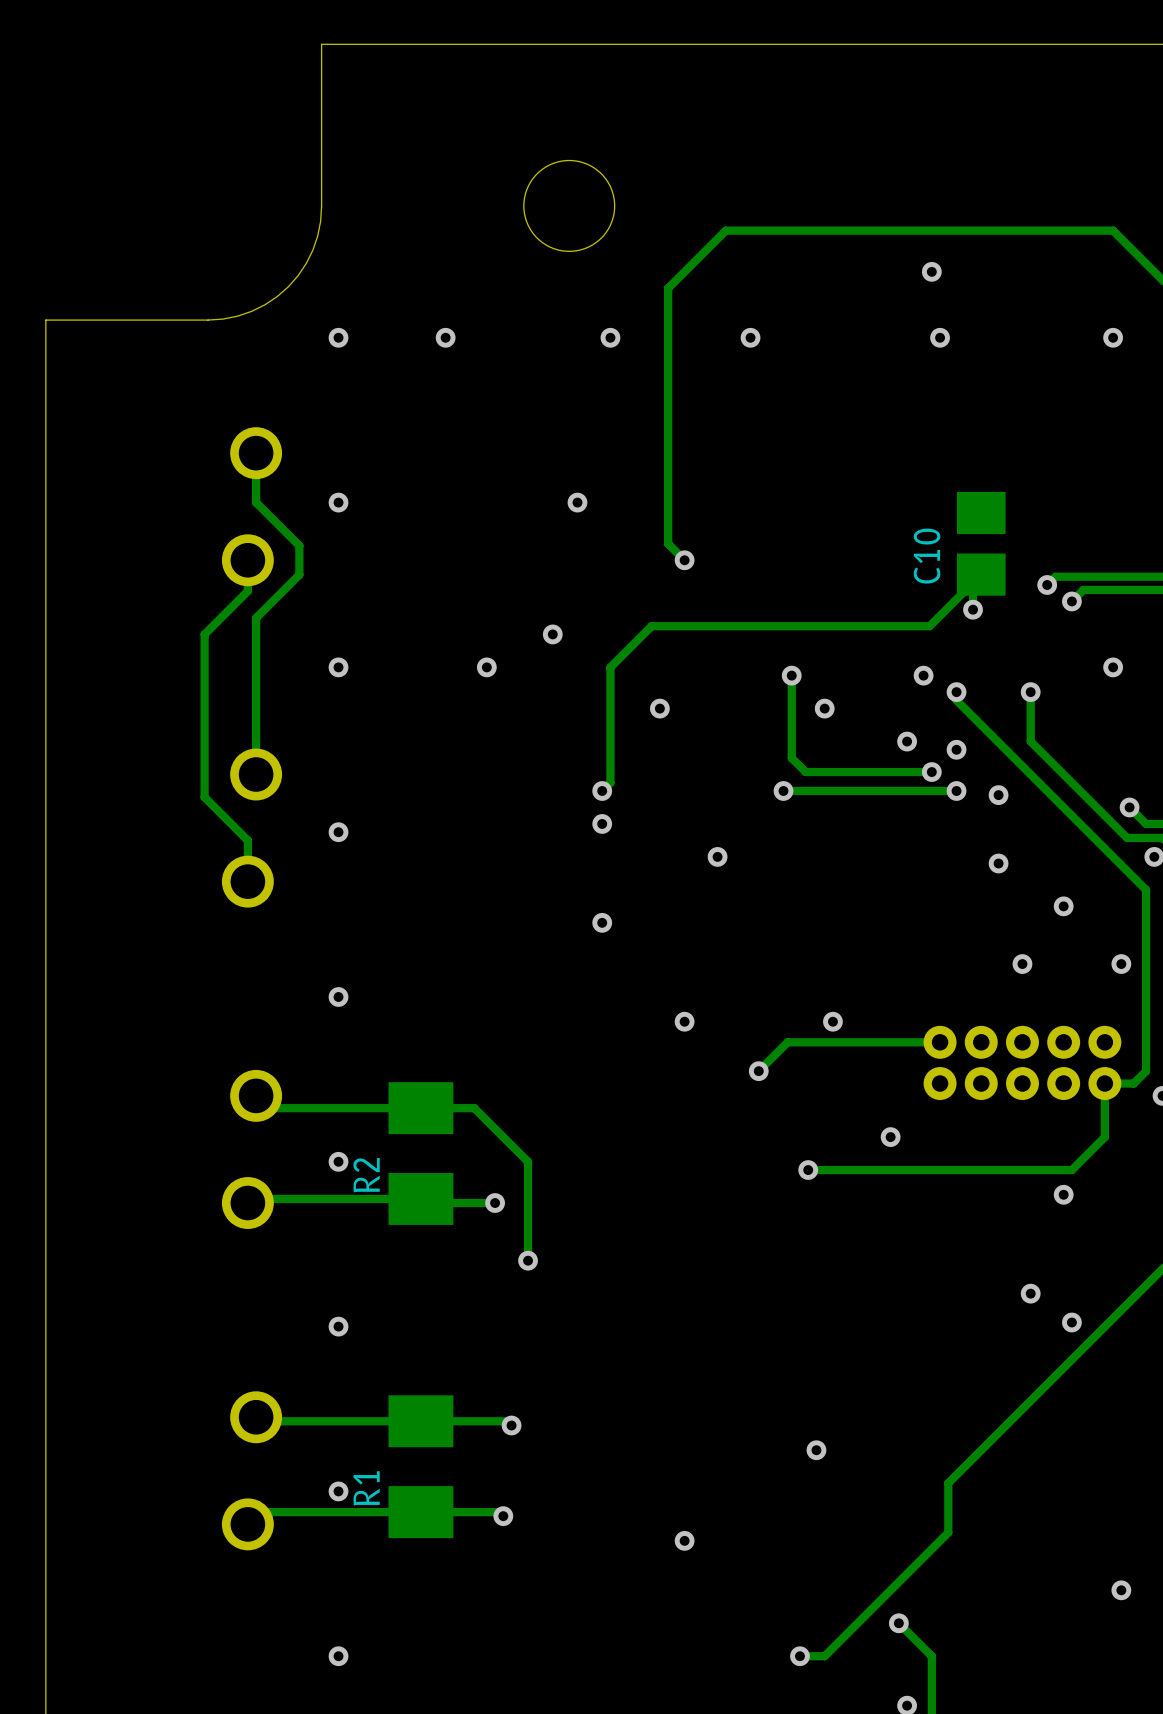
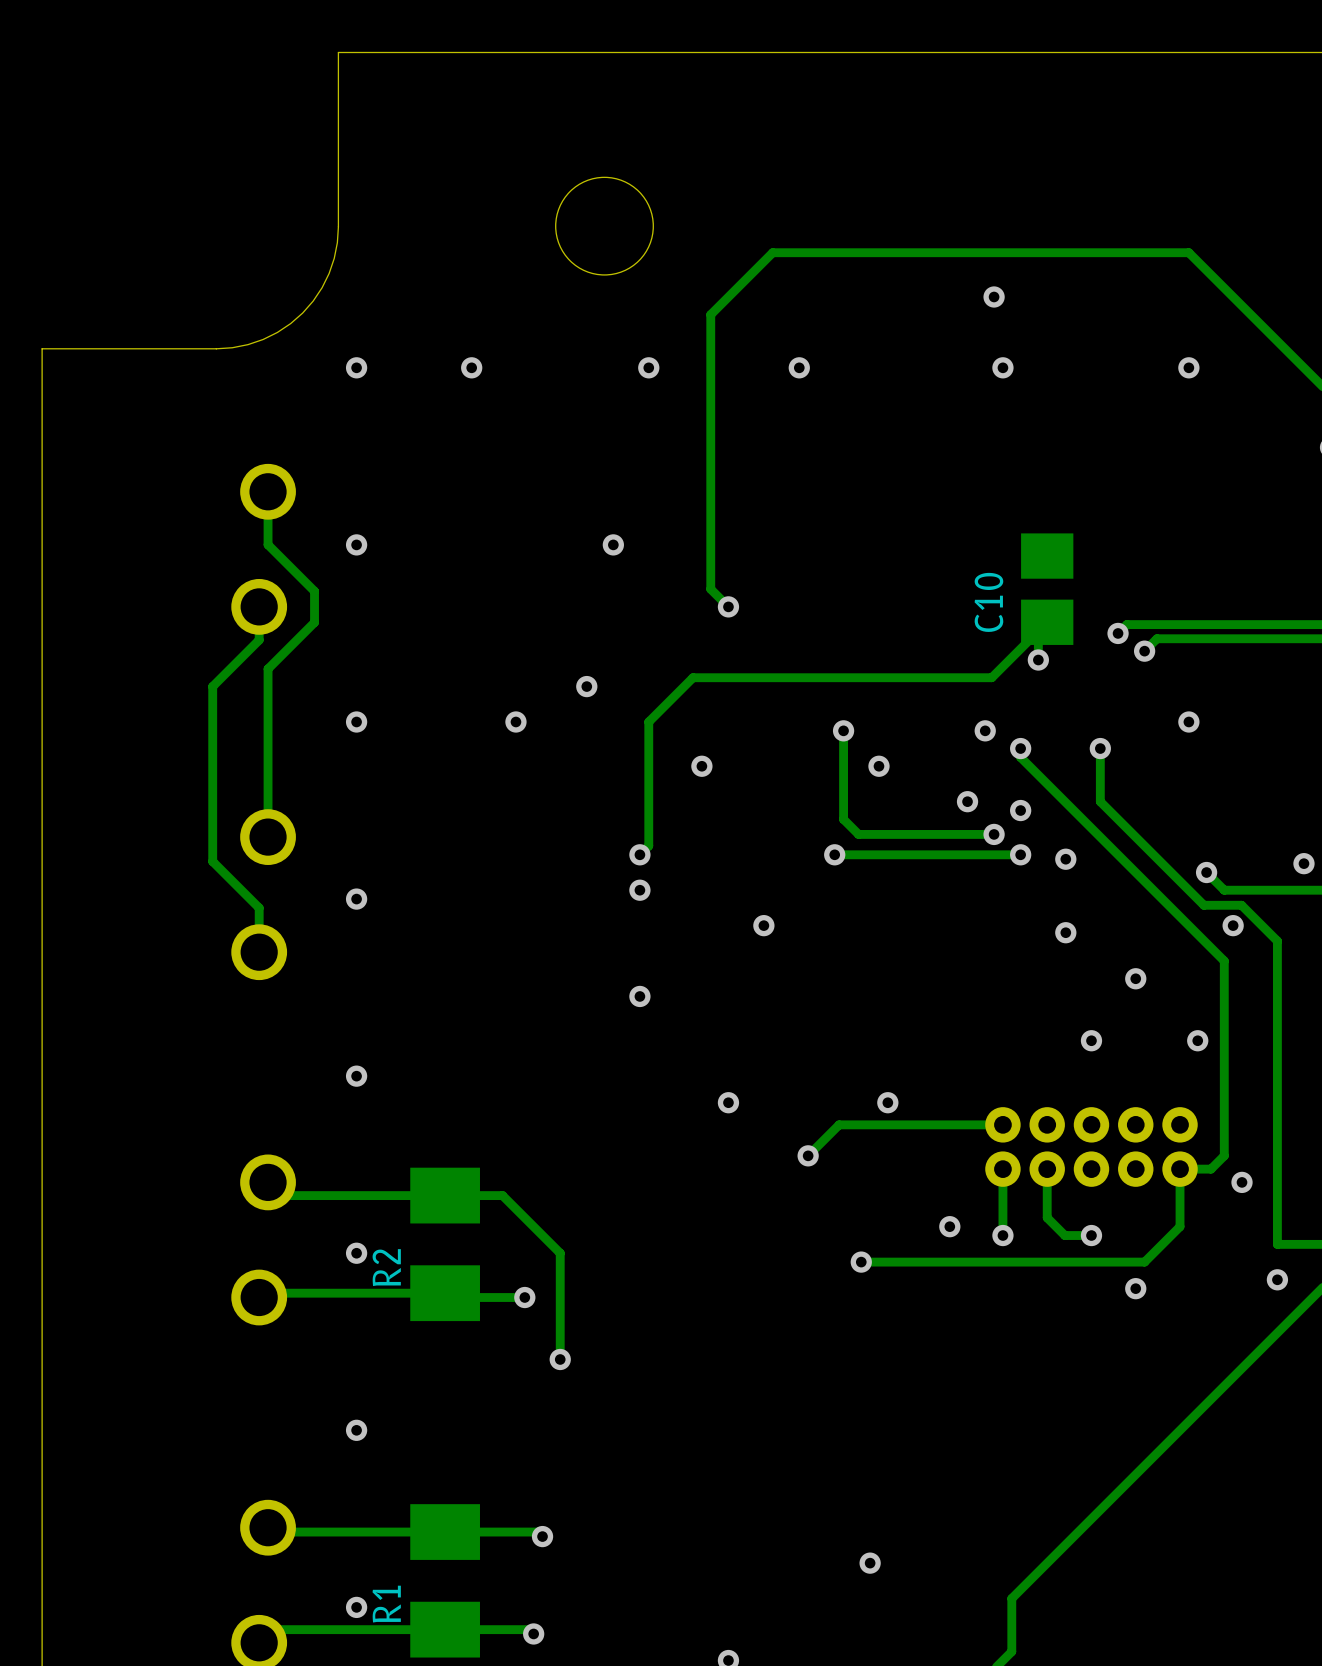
track: none -> (1002, 1169) (1002, 1235)
track: none -> (1047, 1169) (1047, 1217) (1064, 1235) (1091, 1235)
via: none -> (1002, 1235)
via: none -> (1091, 1235)
via: (1030, 1293) -> none
via: (1071, 1322) -> none

